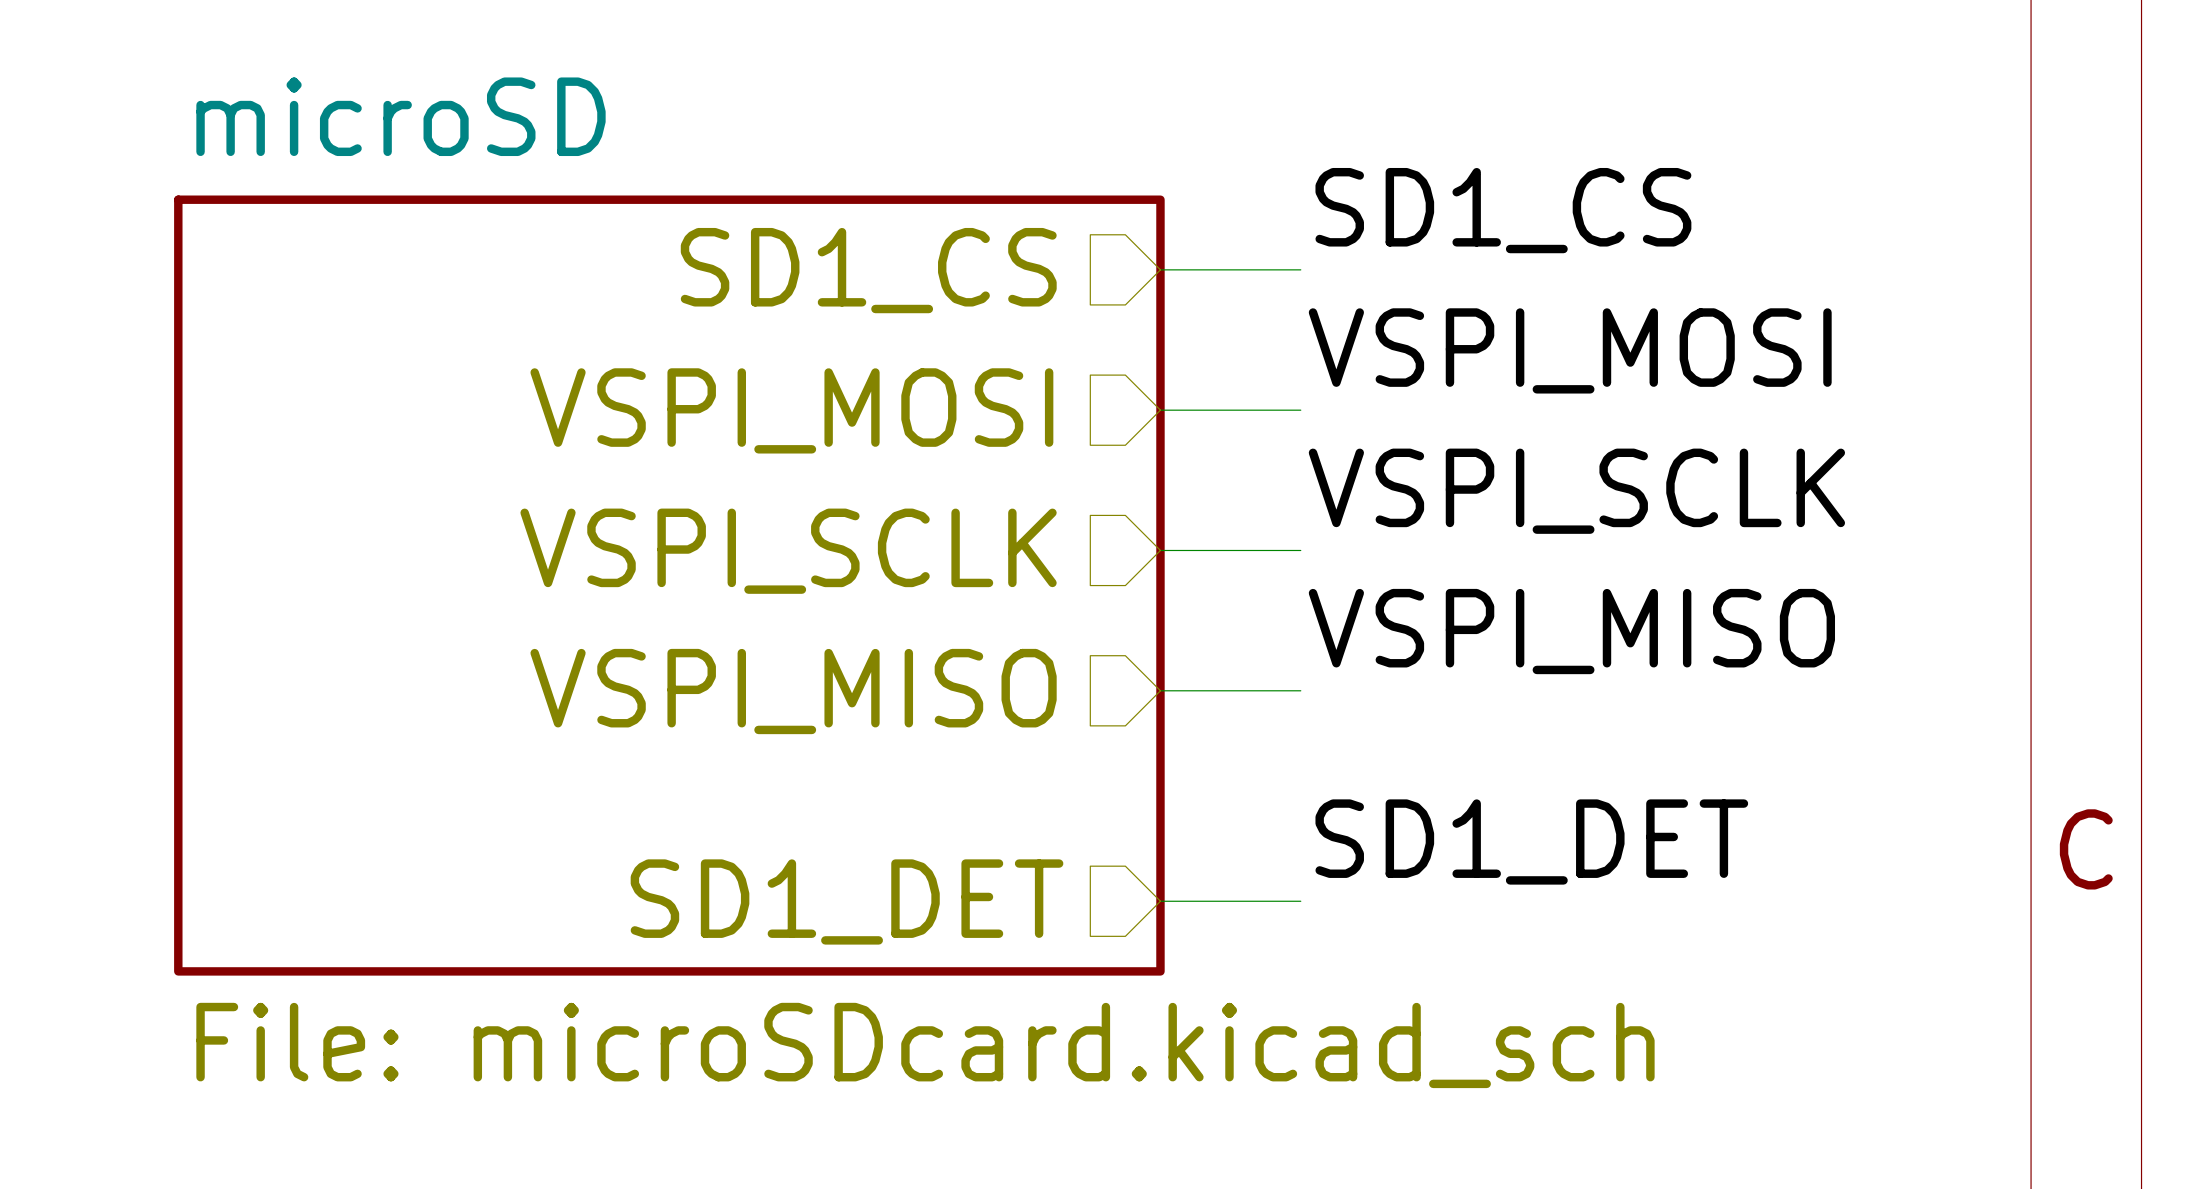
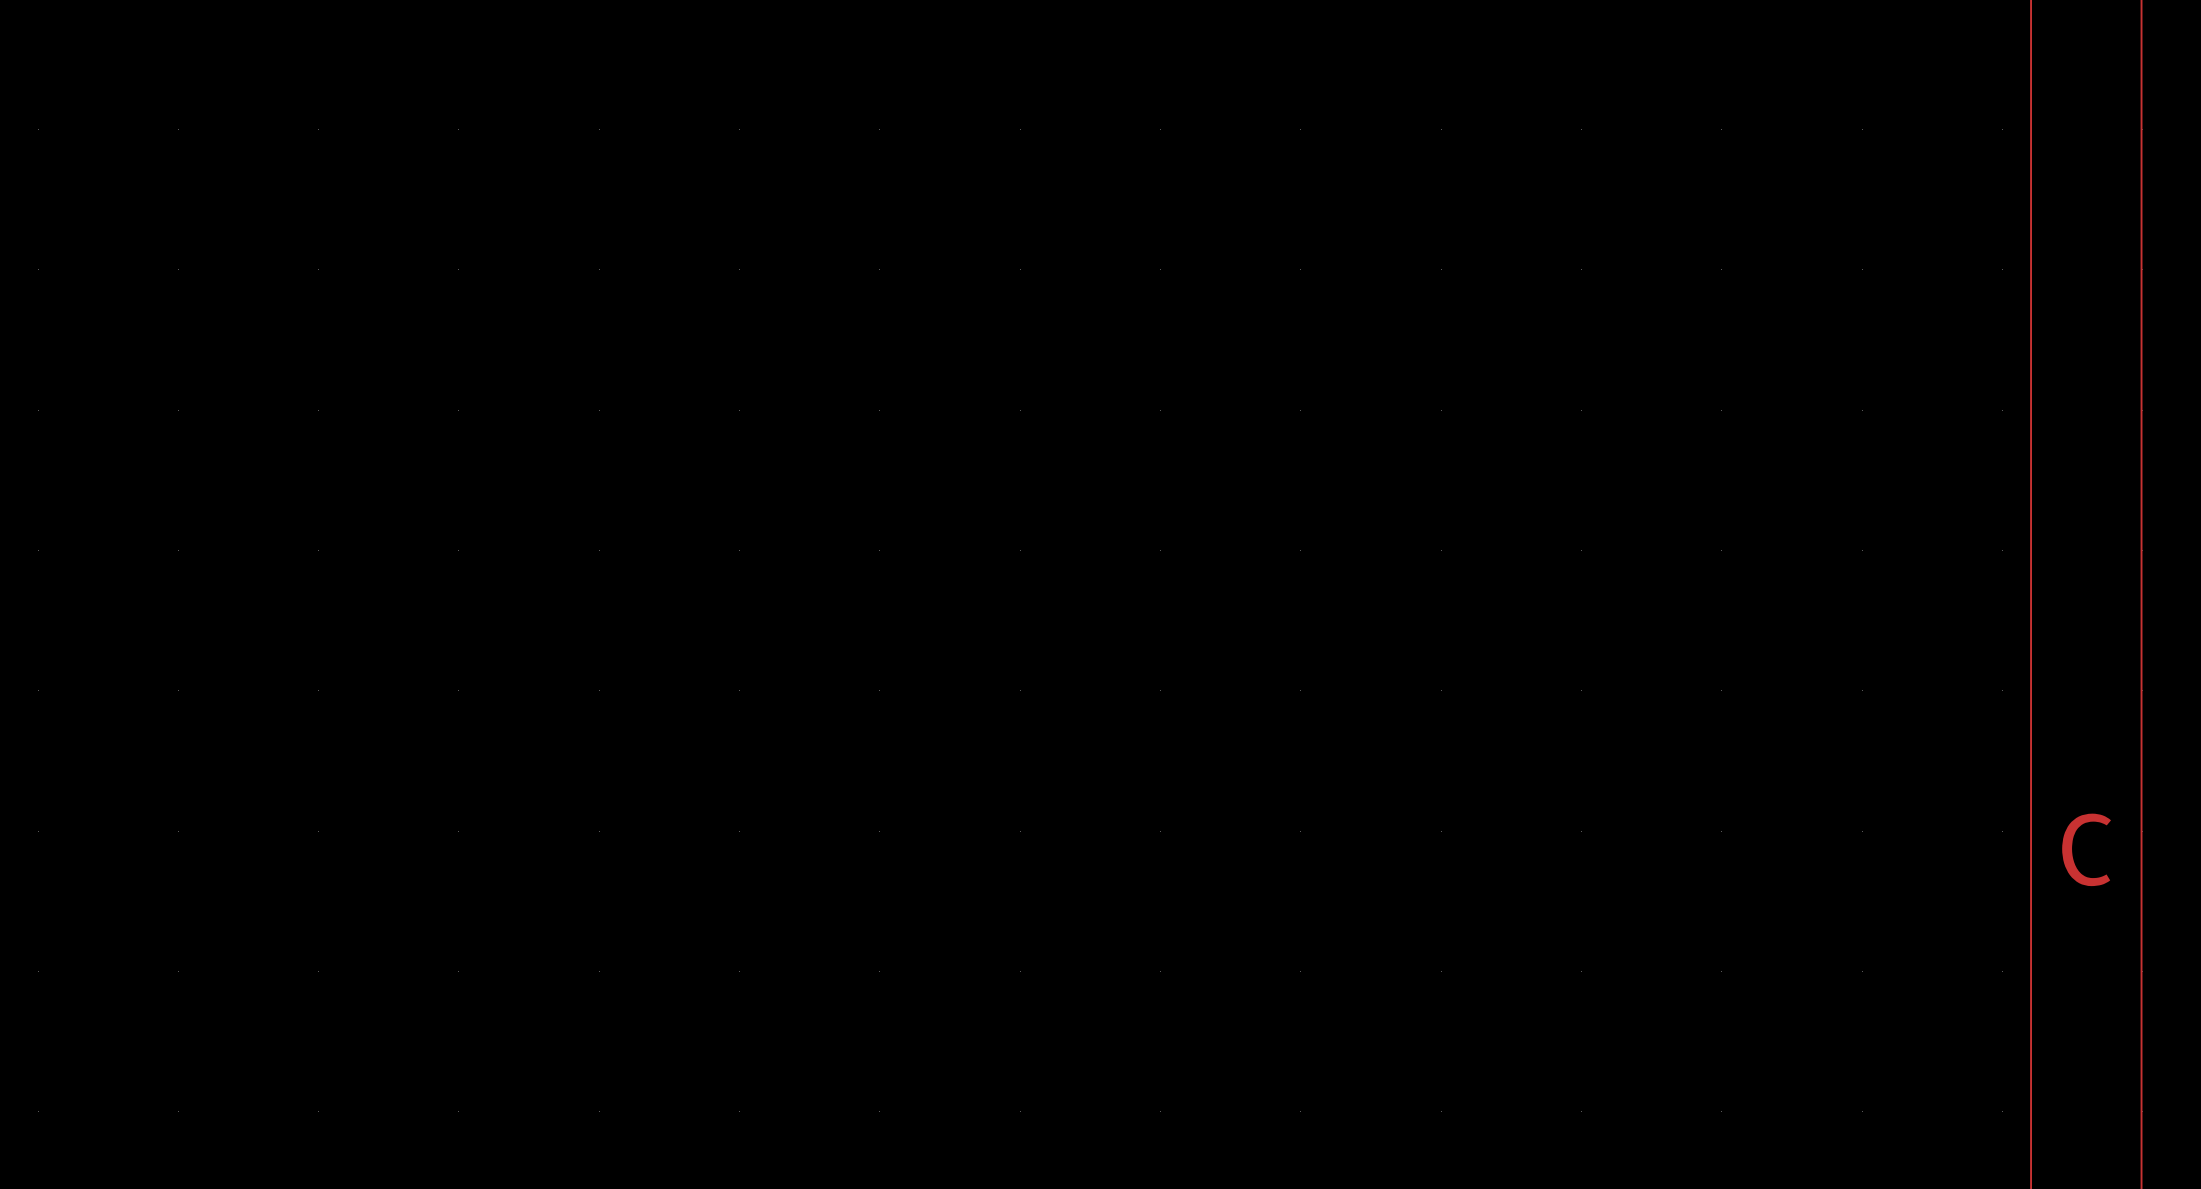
label: SD1_CS (1503, 210) -> none
wire: (1160, 269) (1300, 269) -> none
hierarchical label: SD1_CS (868, 270) -> none
label: VSPI_MOSI (1570, 350) -> none
hierarchical label: VSPI_MOSI (791, 410) -> none
wire: (1160, 410) (1300, 410) -> none
label: VSPI_SCLK (1576, 491) -> none
wire: (1160, 550) (1300, 550) -> none
hierarchical label: VSPI_SCLK (788, 551) -> none
sheet microSD: File: microSDcard.kicad_sch (669, 585) -> none
label: VSPI_MISO (1571, 631) -> none
wire: (1160, 690) (1300, 690) -> none
hierarchical label: VSPI_MISO (793, 691) -> none
label: SD1_DET (1531, 841) -> none
hierarchical label: SD1_DET (847, 901) -> none
wire: (1160, 901) (1300, 901) -> none

